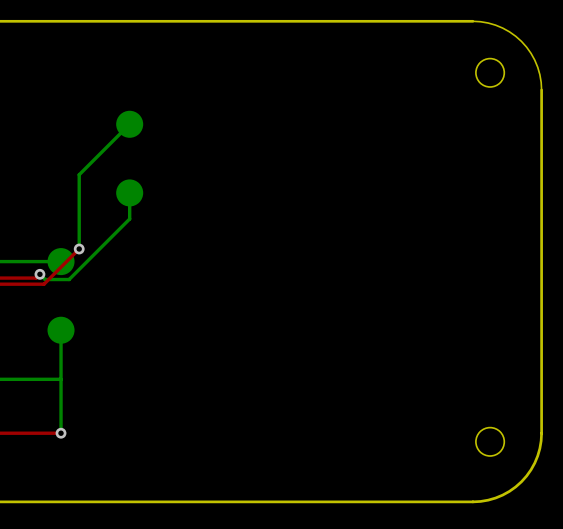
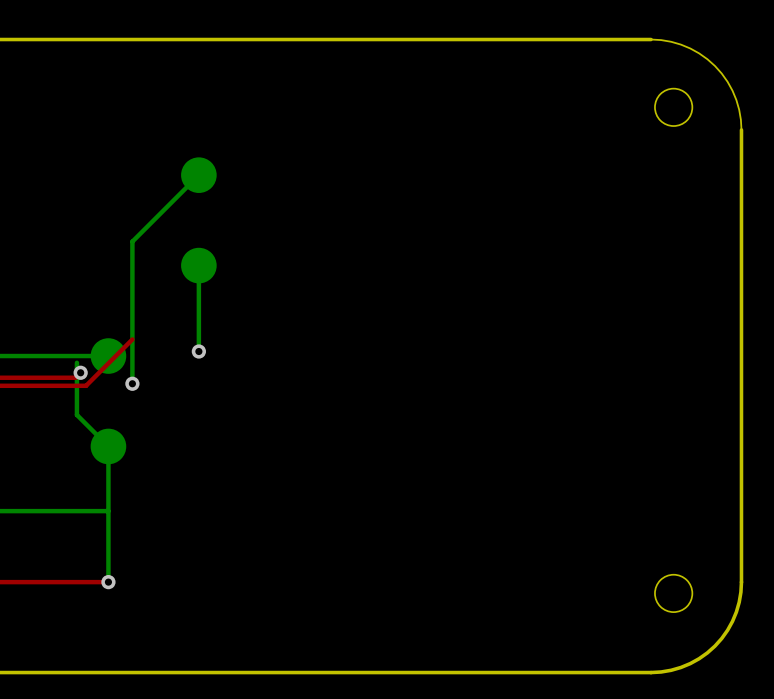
bottom track: (129, 218) (69, 279) (45, 279) (39, 274) -> (198, 299) (198, 351)
bottom track: none -> (132, 339) (132, 383)
via: (79, 249) -> none
via: none -> (198, 351)
bottom track: none -> (76, 362) (76, 414) (108, 446)
via: none -> (132, 383)

